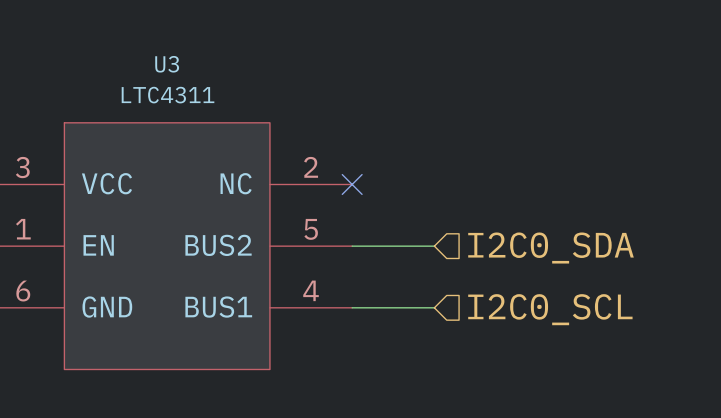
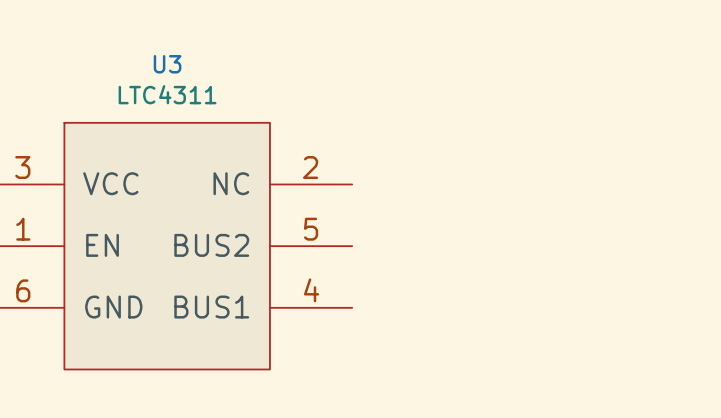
no-connect mark: (352, 184) -> none
wire: (352, 246) (434, 246) -> none
hierarchical label: I2C0_SDA (550, 248) -> none
wire: (352, 307) (434, 307) -> none
hierarchical label: I2C0_SCL (550, 309) -> none

